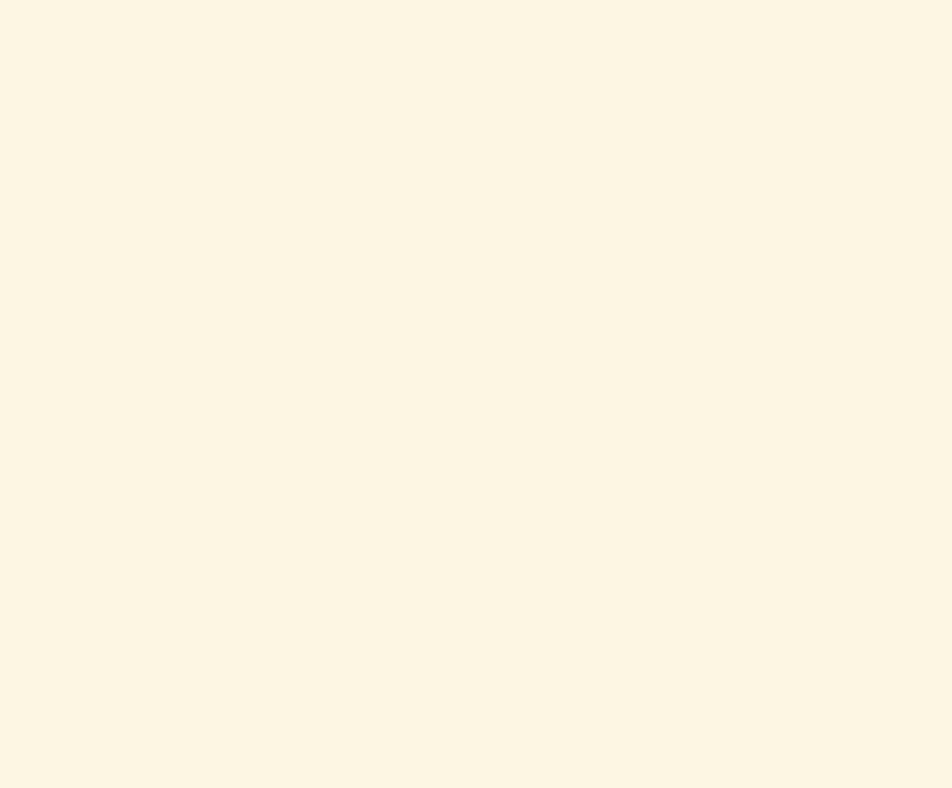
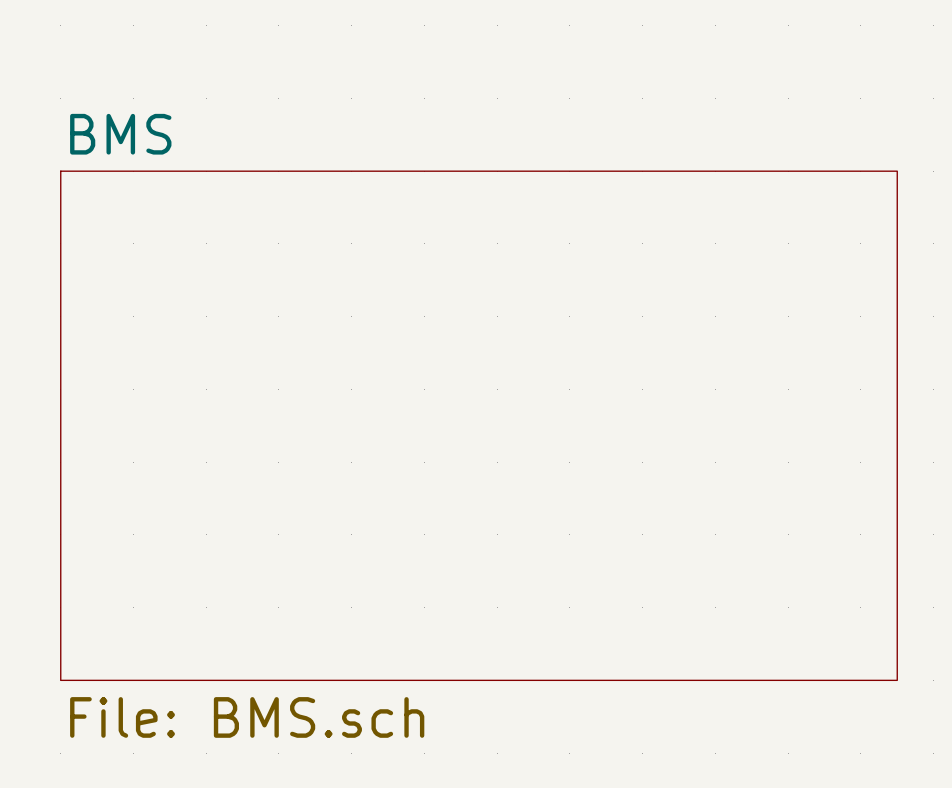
sheet BMS: none -> File: BMS.sch (479, 425)

